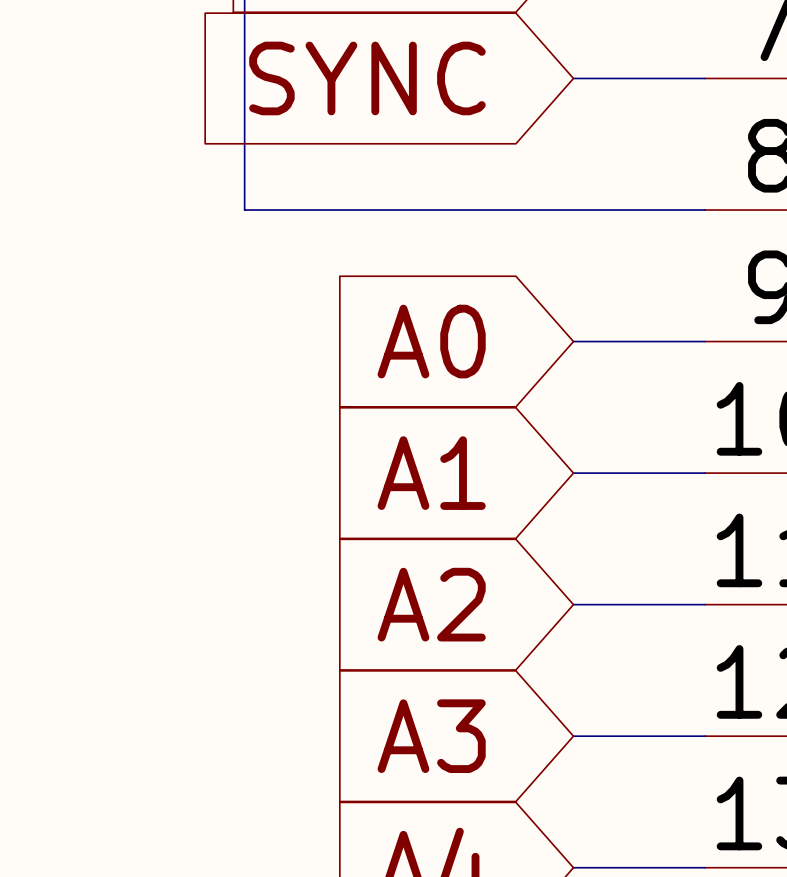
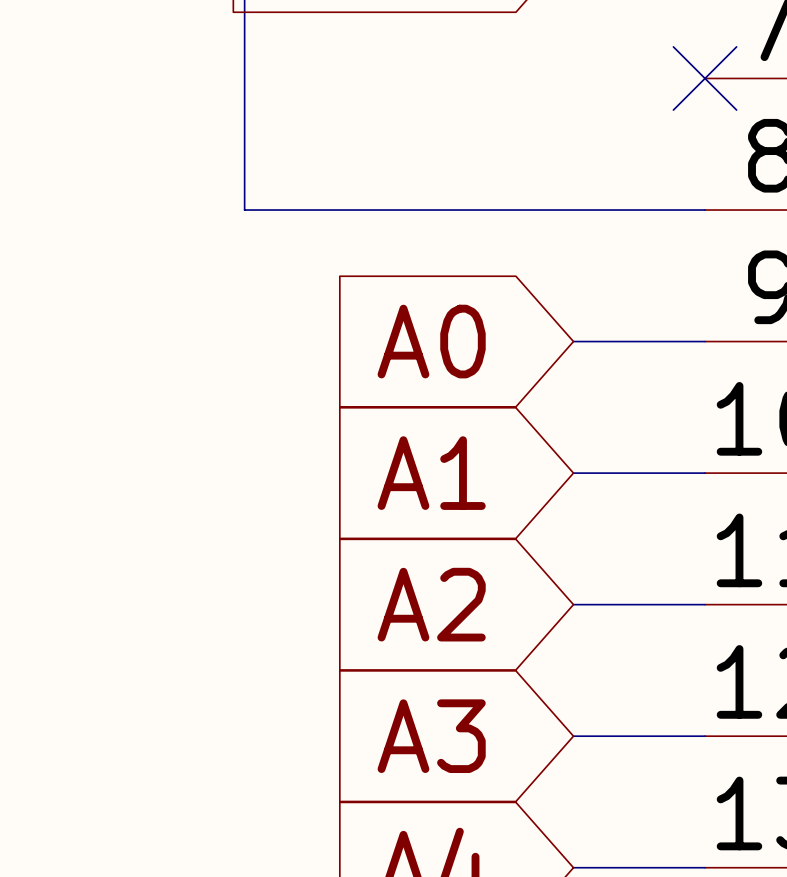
global label: SYNC (367, 78) -> none
wire: (573, 78) (705, 78) -> none
no-connect mark: none -> (705, 78)

